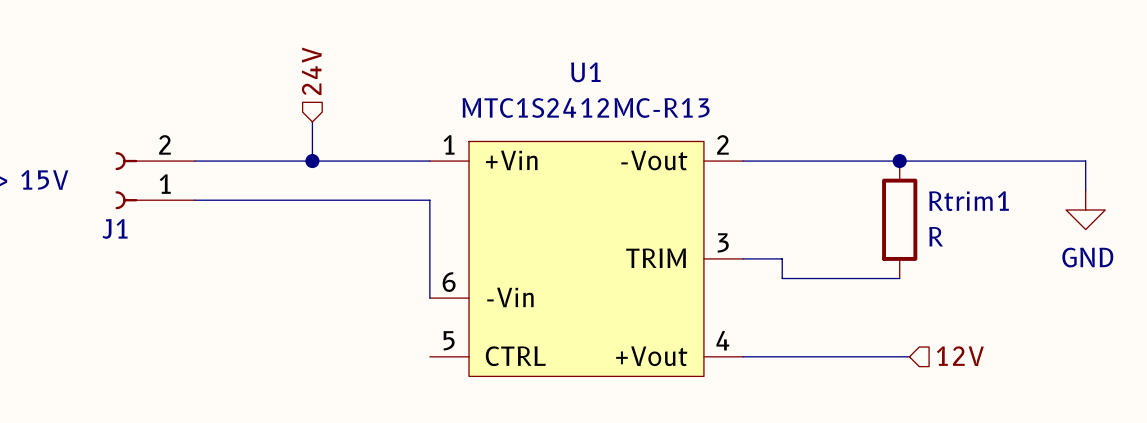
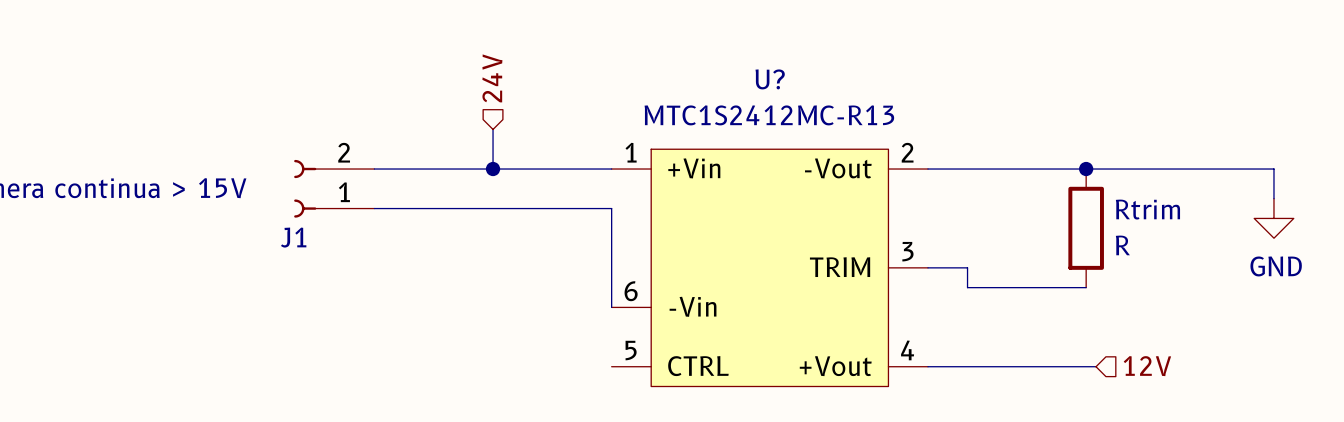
U1 name: U1 (585, 72) -> U? (770, 79)
Rtrim1 name: Rtrim1 (969, 201) -> Rtrim (1147, 209)

